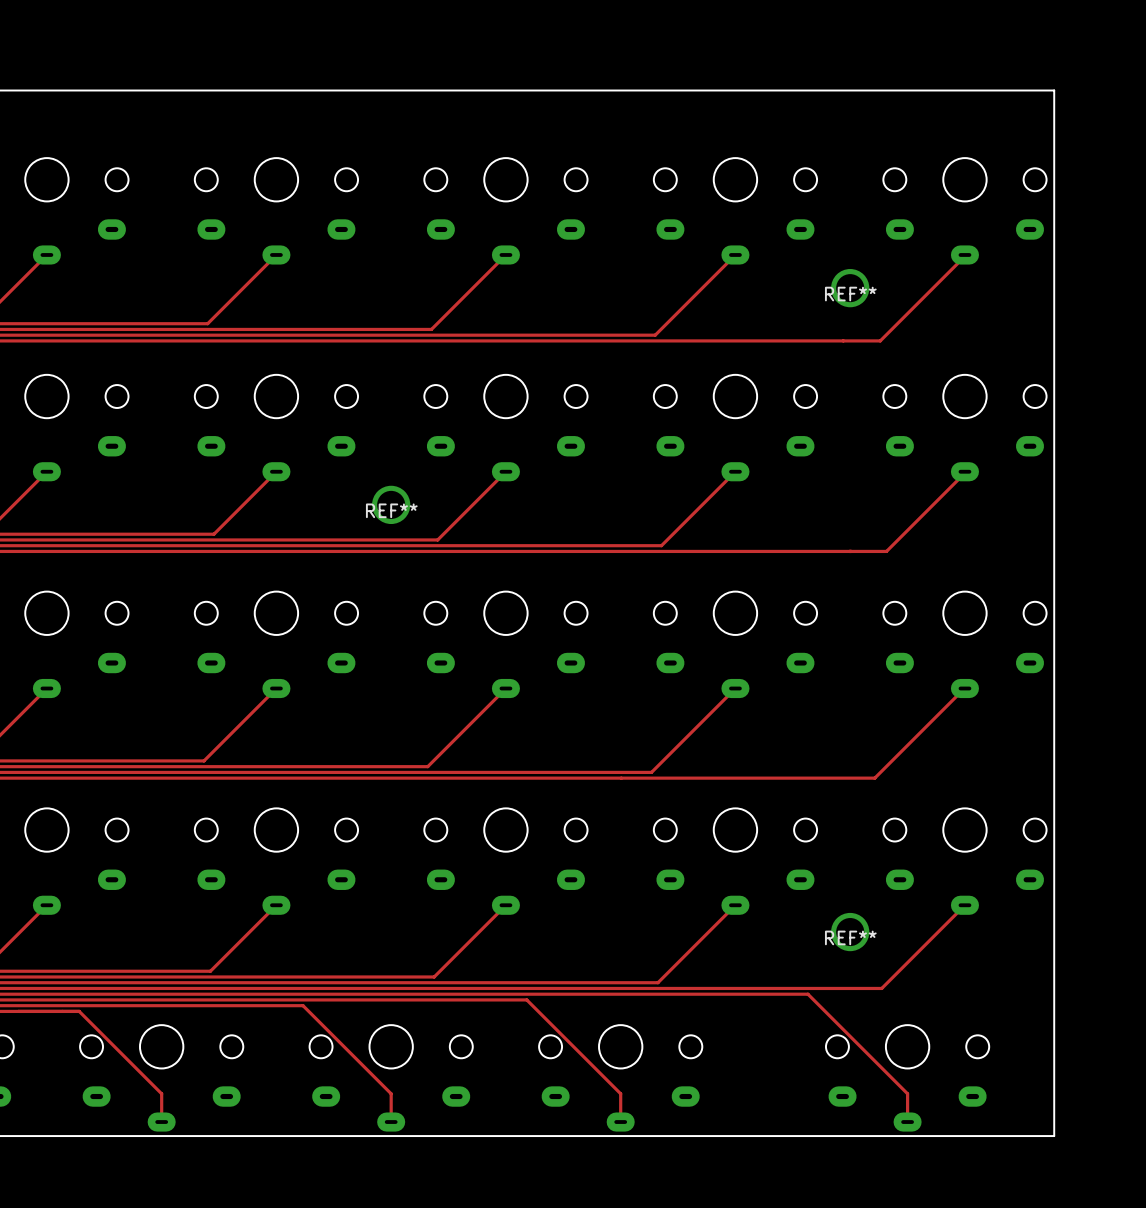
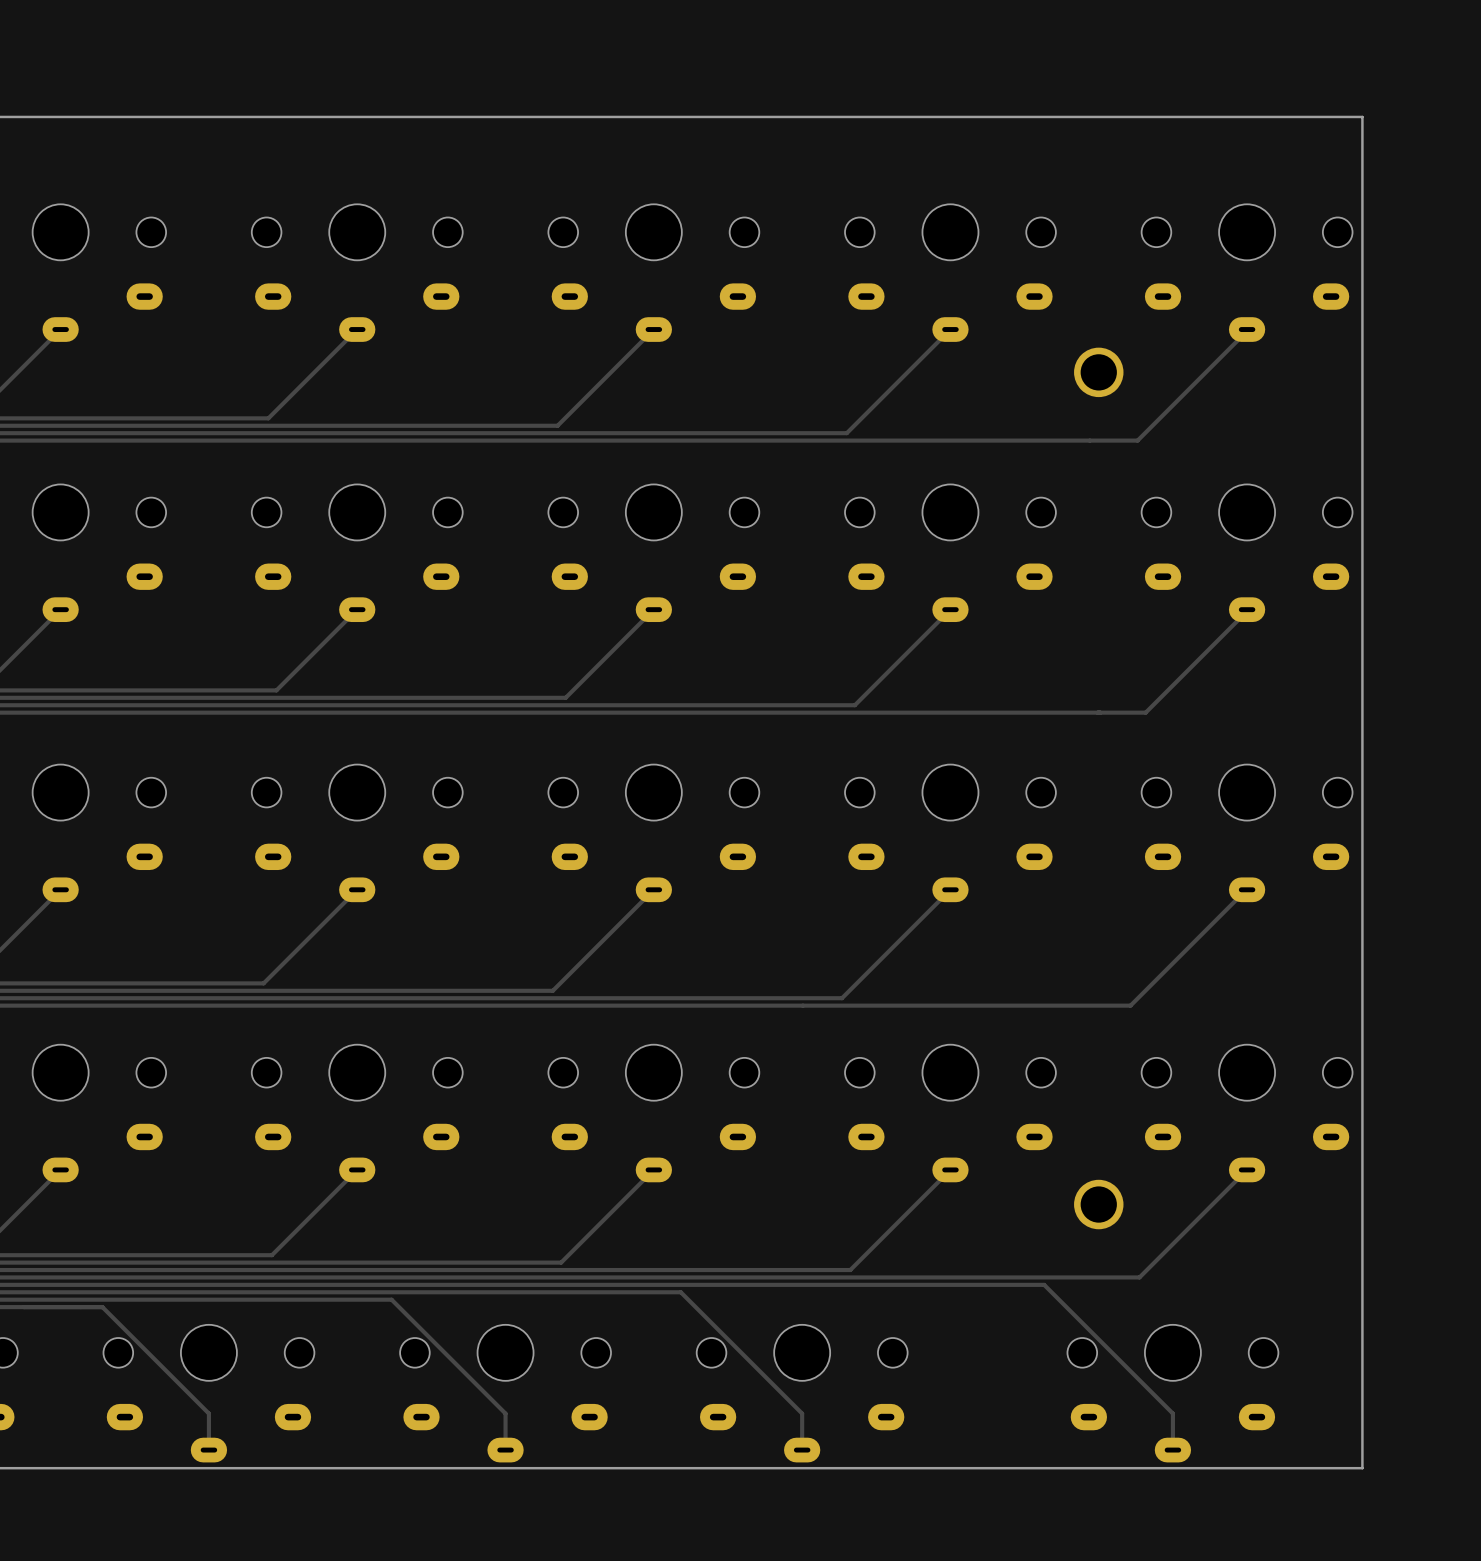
REF** name: REF** (850, 294) -> none
REF**: (391, 504) -> none
REF** name: REF** (850, 937) -> none

